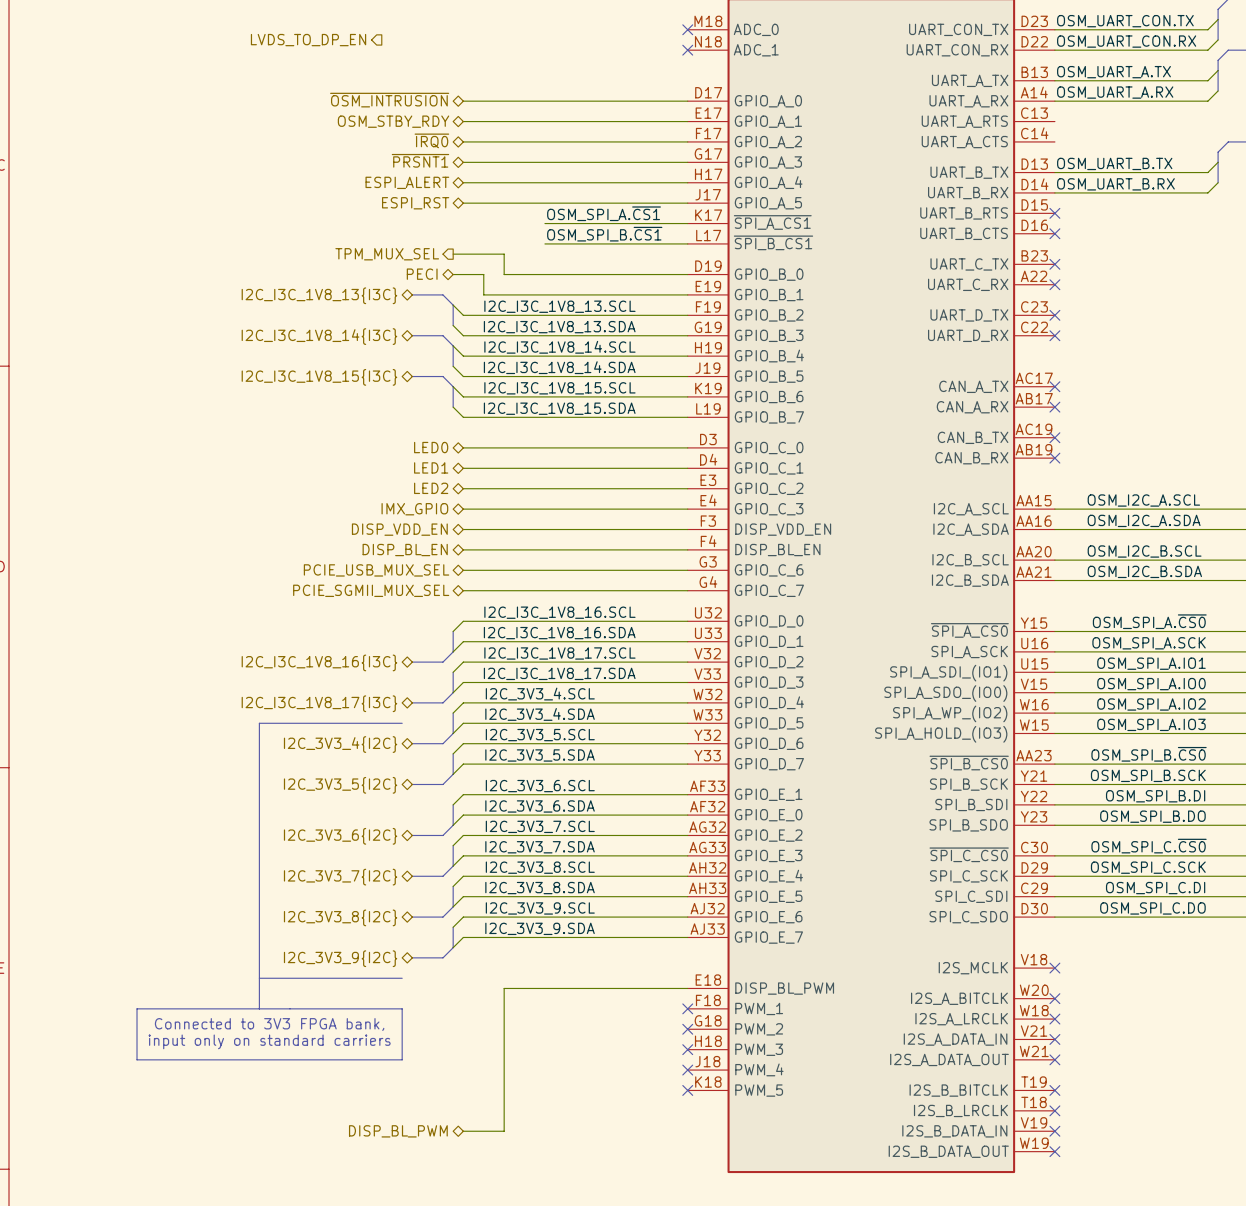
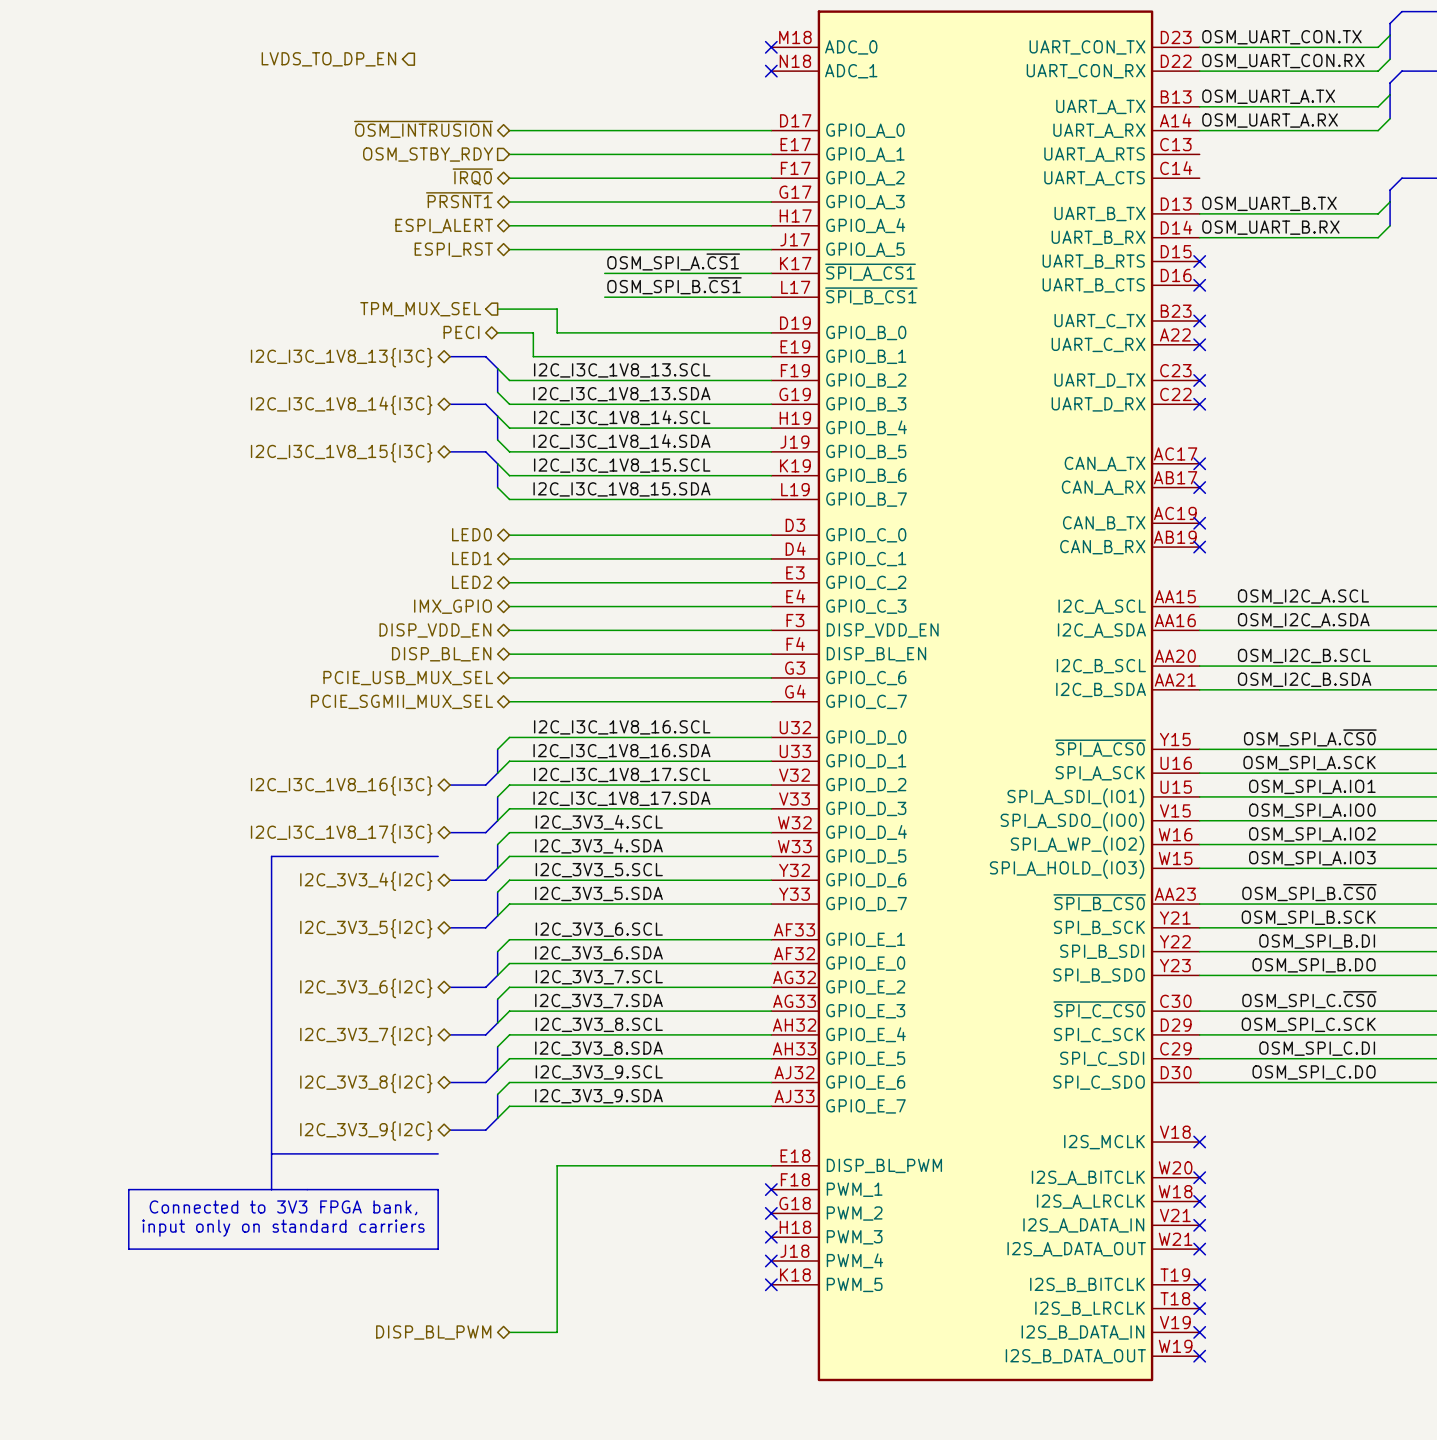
hierarchical label shape: bidirectional (393, 121) -> input (428, 154)

